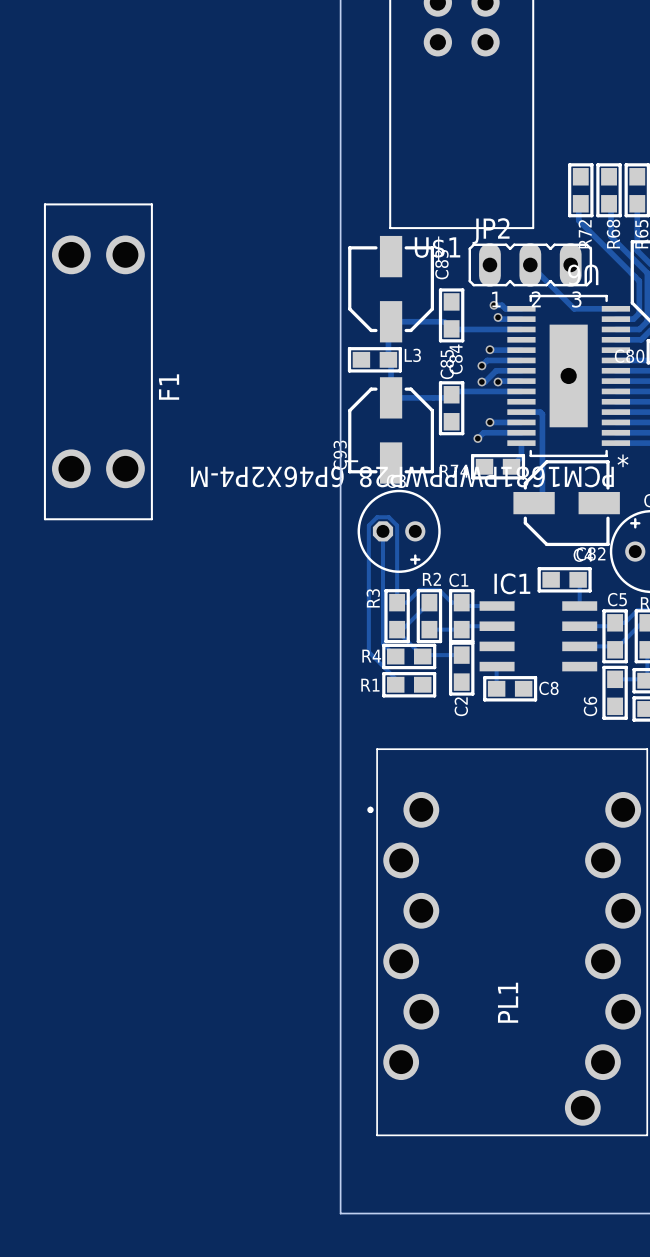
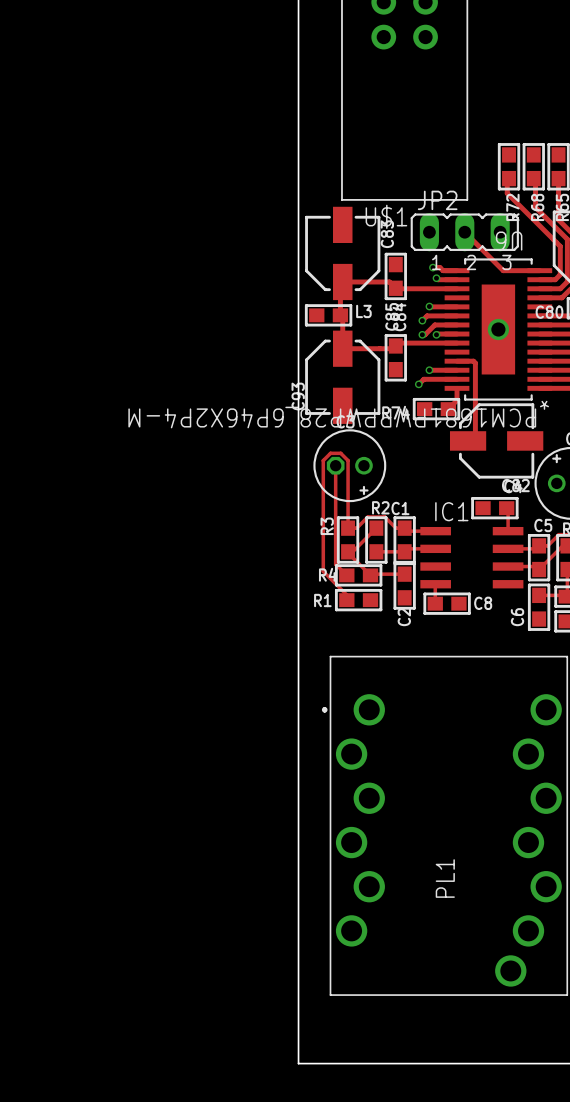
F1: (98, 361) -> none

